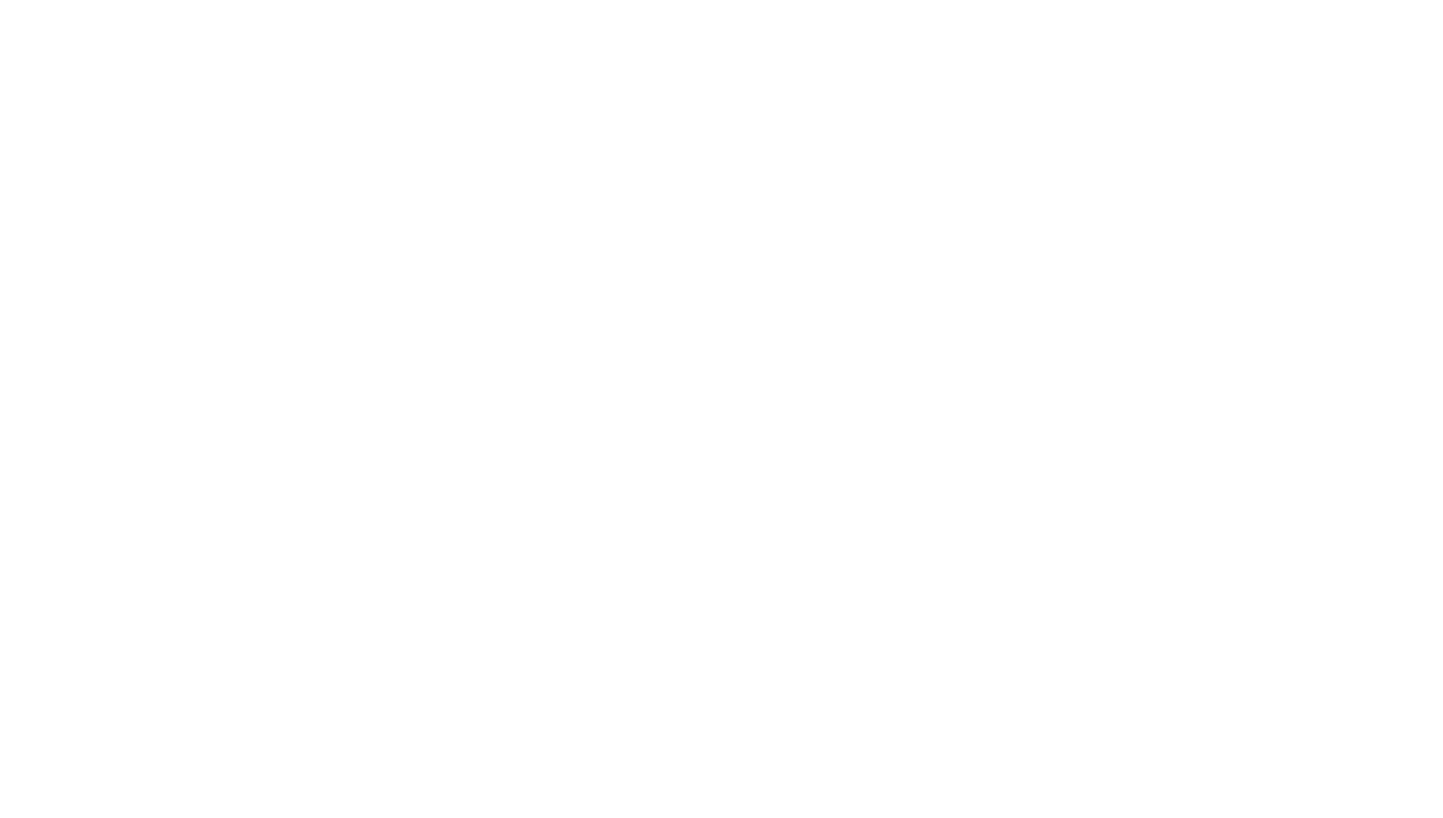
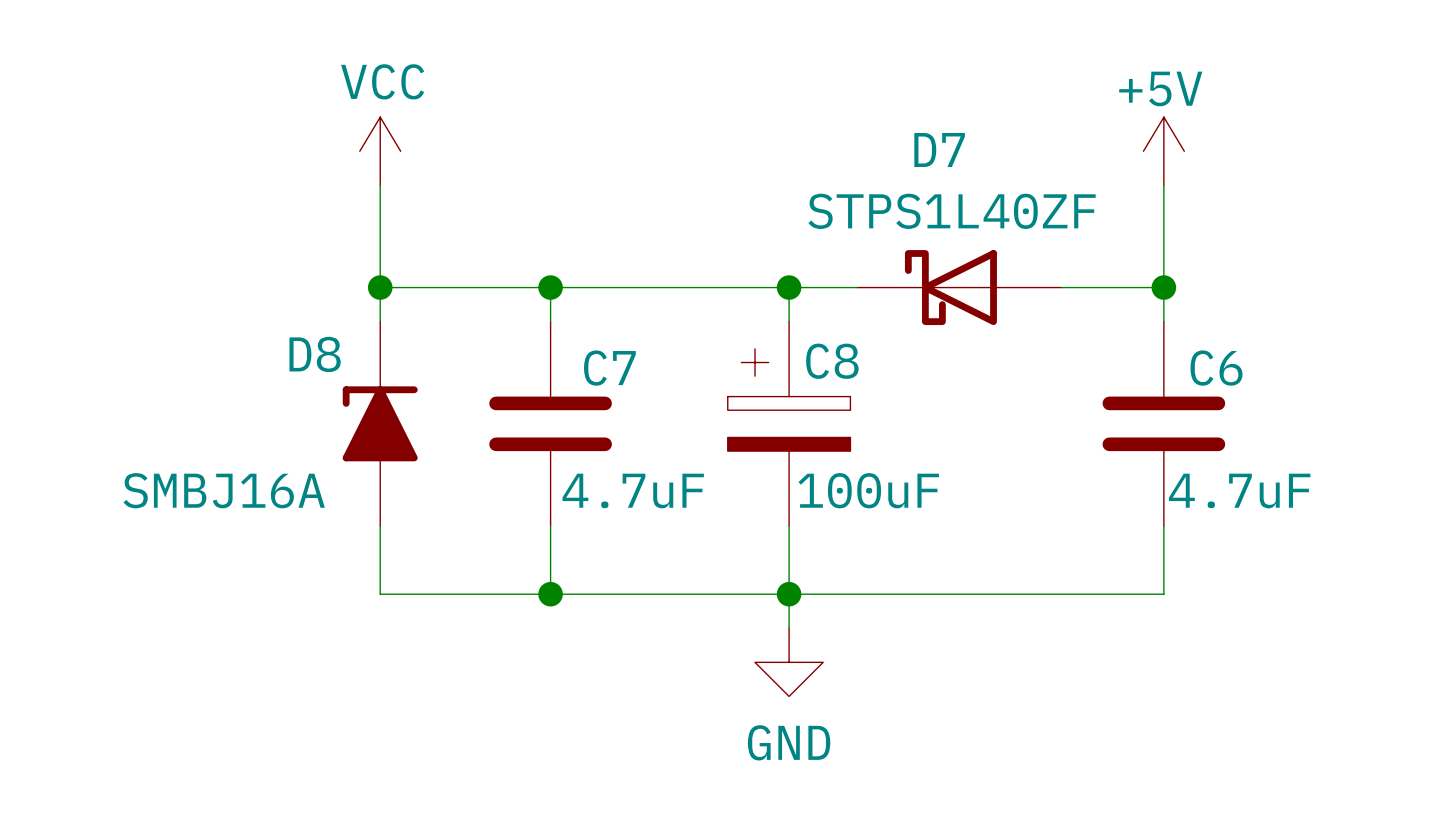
power symbol: none -> VCC (380, 151)
power symbol: none -> +5V (1163, 151)
wire: none -> (380, 185) (380, 321)
wire: none -> (1163, 185) (1163, 321)
wire: none -> (380, 287) (857, 287)
junction: none -> (380, 287)
wire: none -> (550, 287) (550, 321)
junction: none -> (550, 287)
wire: none -> (789, 287) (789, 321)
junction: none -> (789, 287)
D7: none -> STPS1L40ZF (959, 287)
wire: none -> (1061, 287) (1163, 287)
junction: none -> (1163, 287)
D8: none -> SMBJ16A (380, 423)
C7: none -> 4.7uF (550, 423)
C8: none -> 100uF (789, 423)
C6: none -> 4.7uF (1163, 423)
wire: none -> (380, 526) (380, 594) (1163, 594) (1163, 526)
wire: none -> (550, 526) (550, 594)
wire: none -> (789, 526) (789, 628)
junction: none -> (550, 594)
junction: none -> (789, 594)
power symbol: none -> GND (789, 662)

